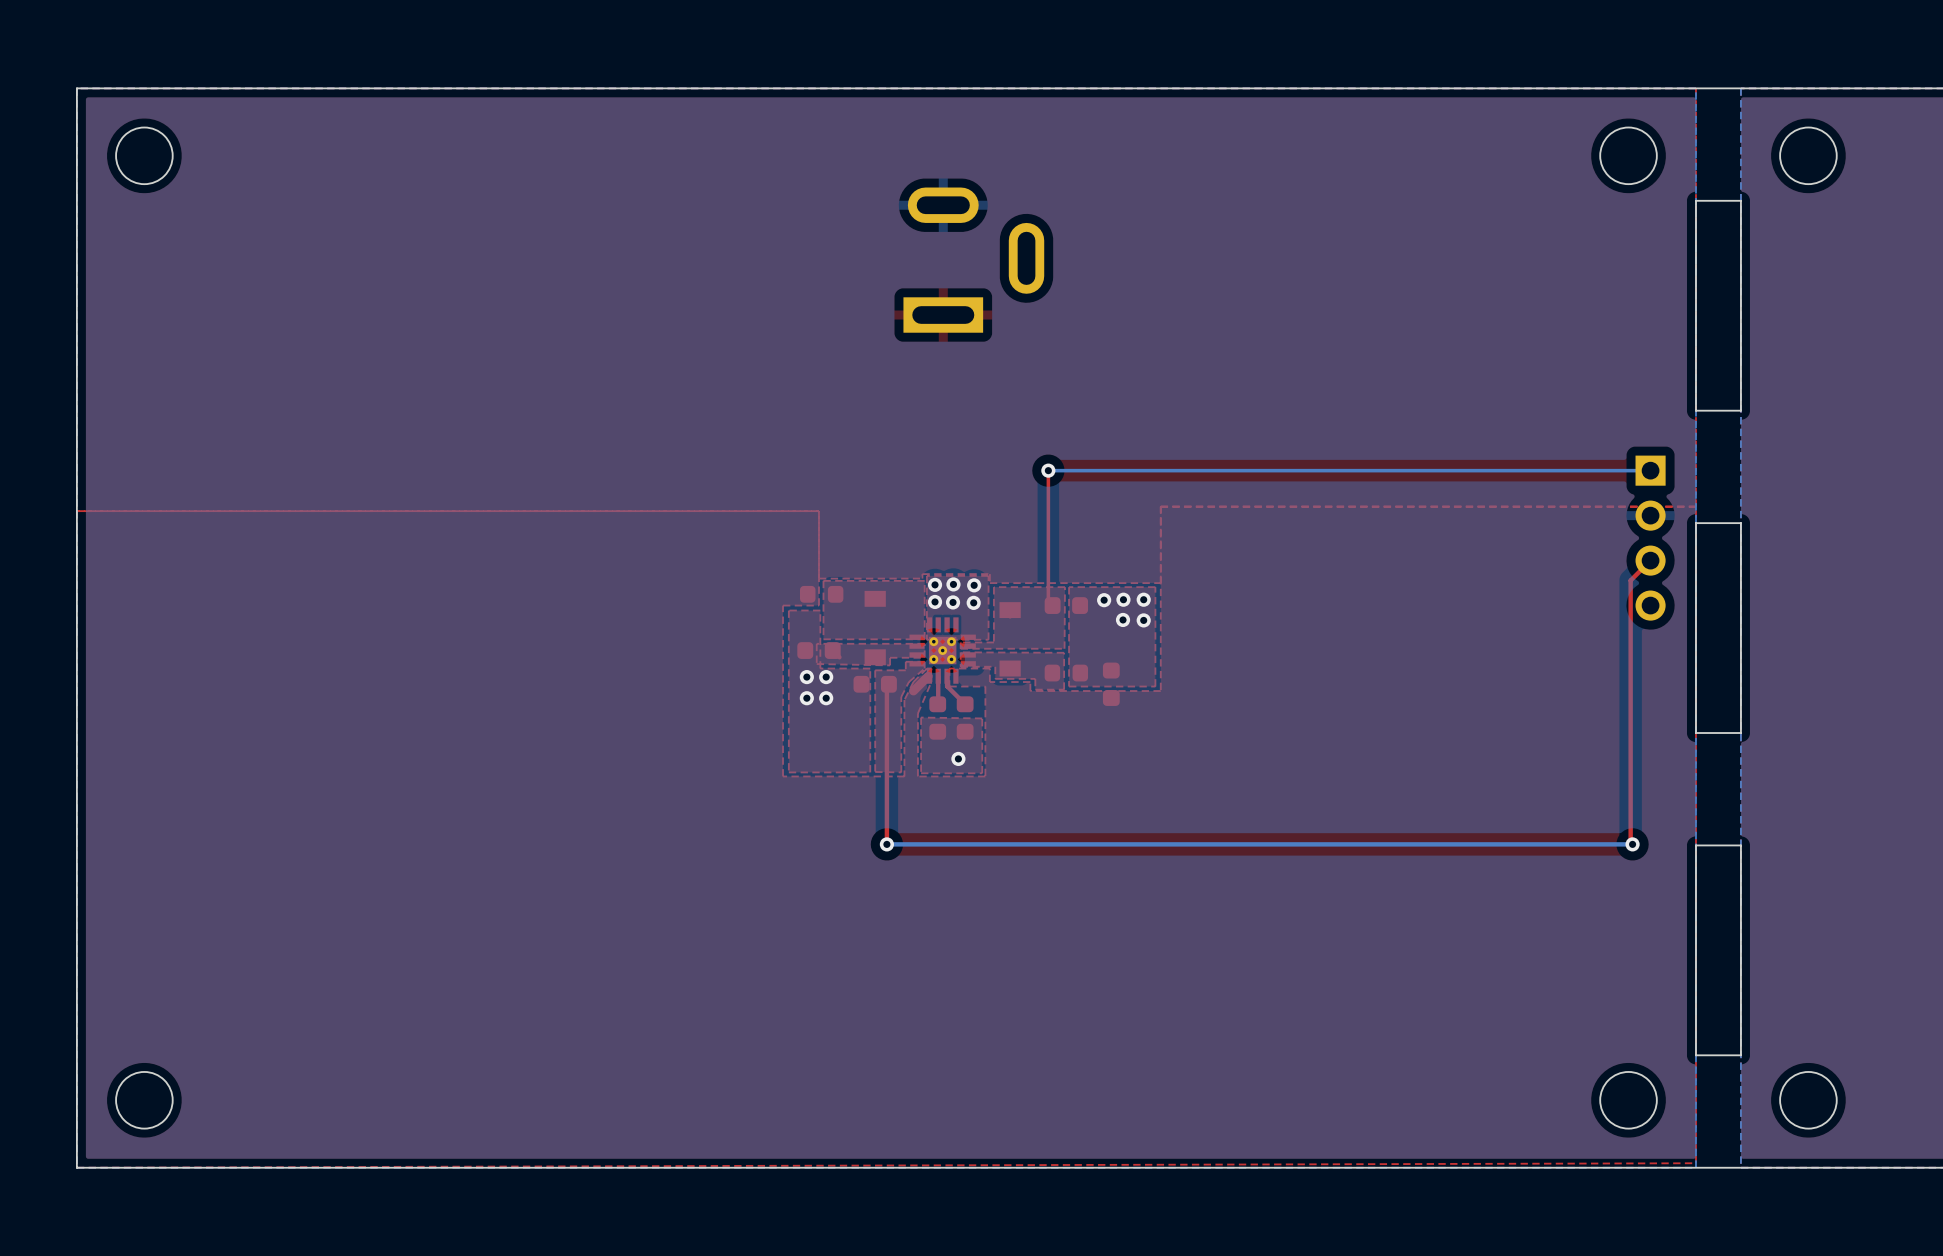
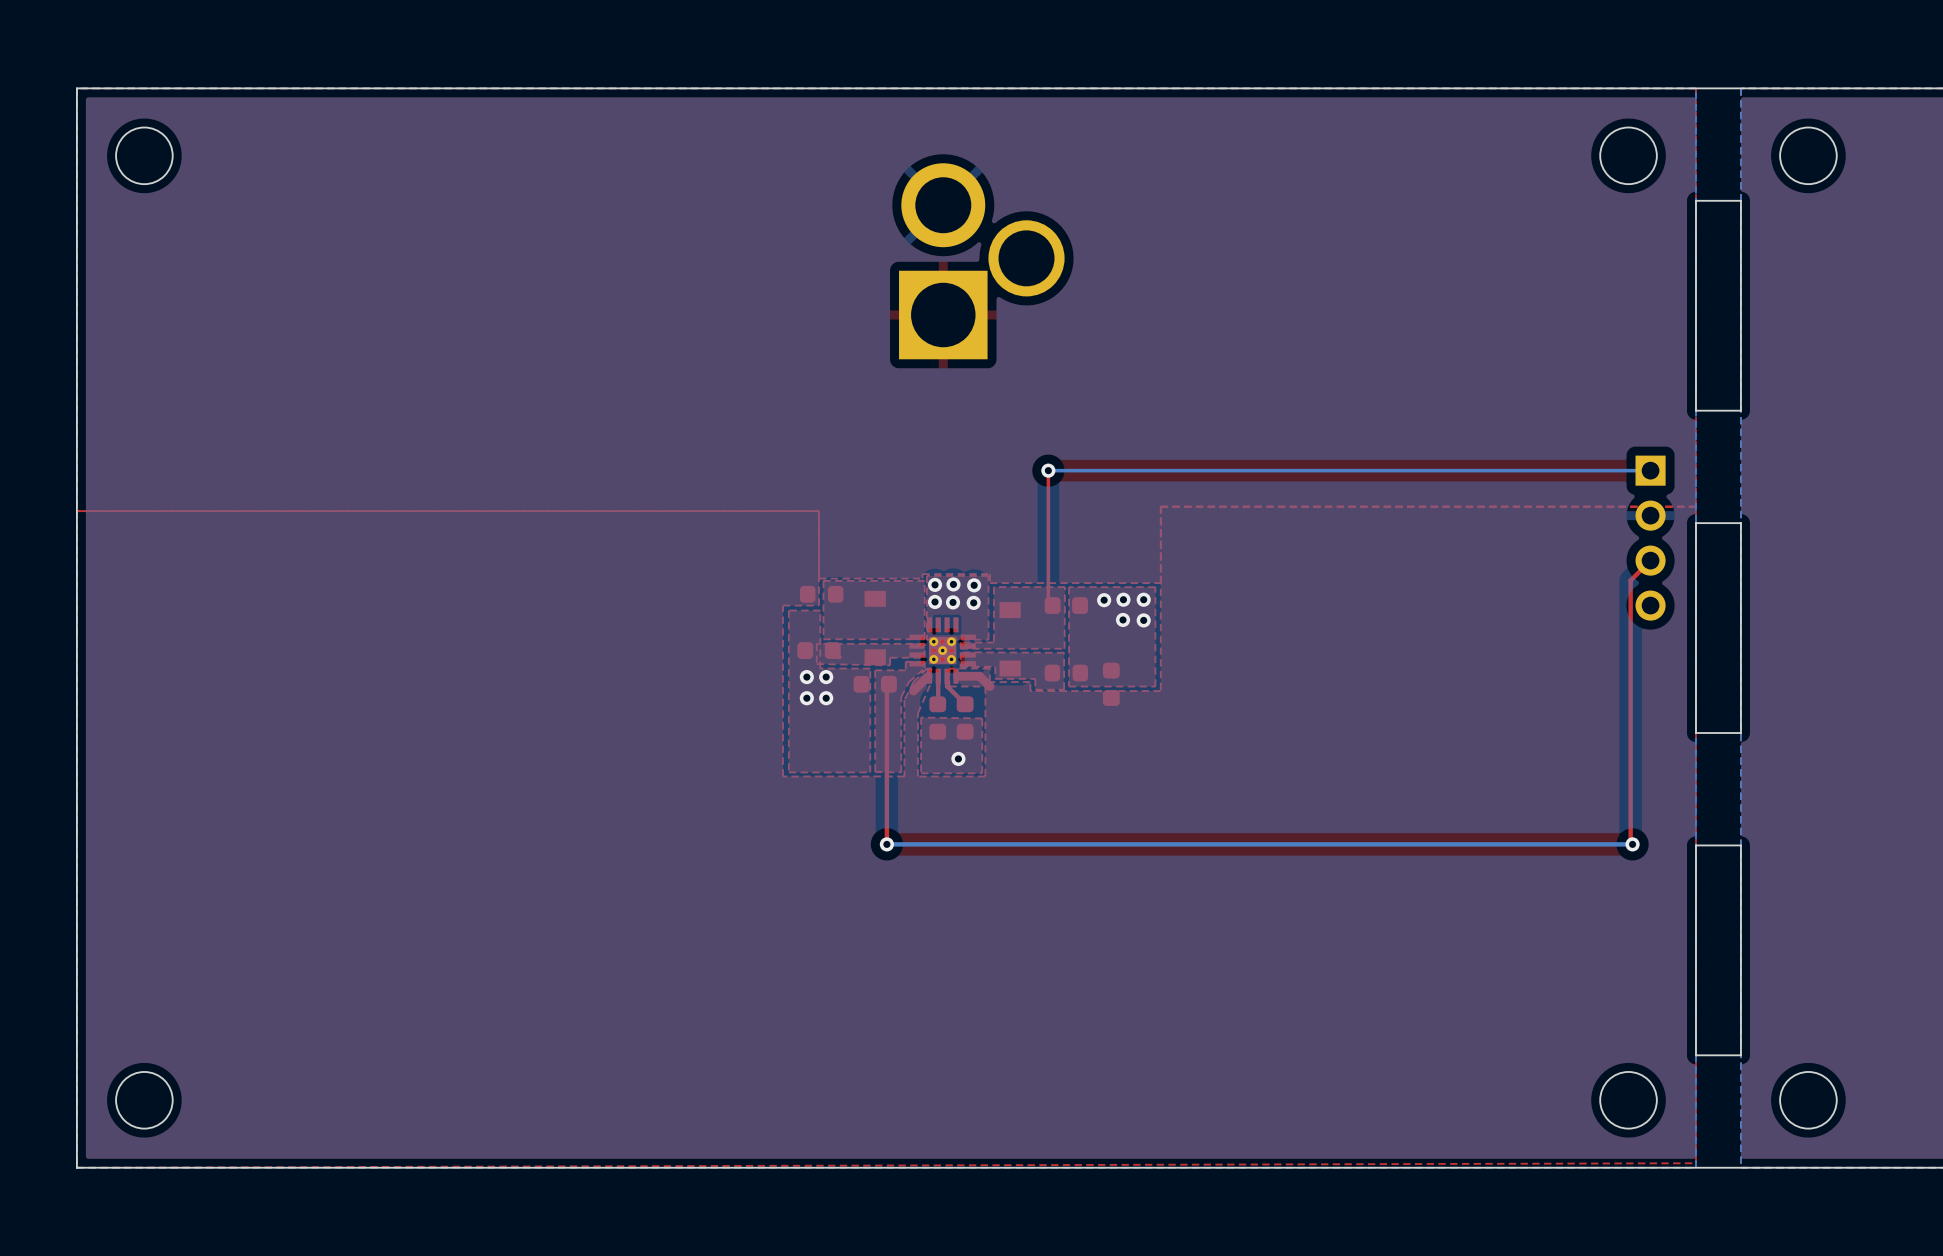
part footprint: [903, 187, 1045, 333] -> [899, 163, 1065, 360]
top track: none -> (957, 676) (979, 676) (989, 686)

